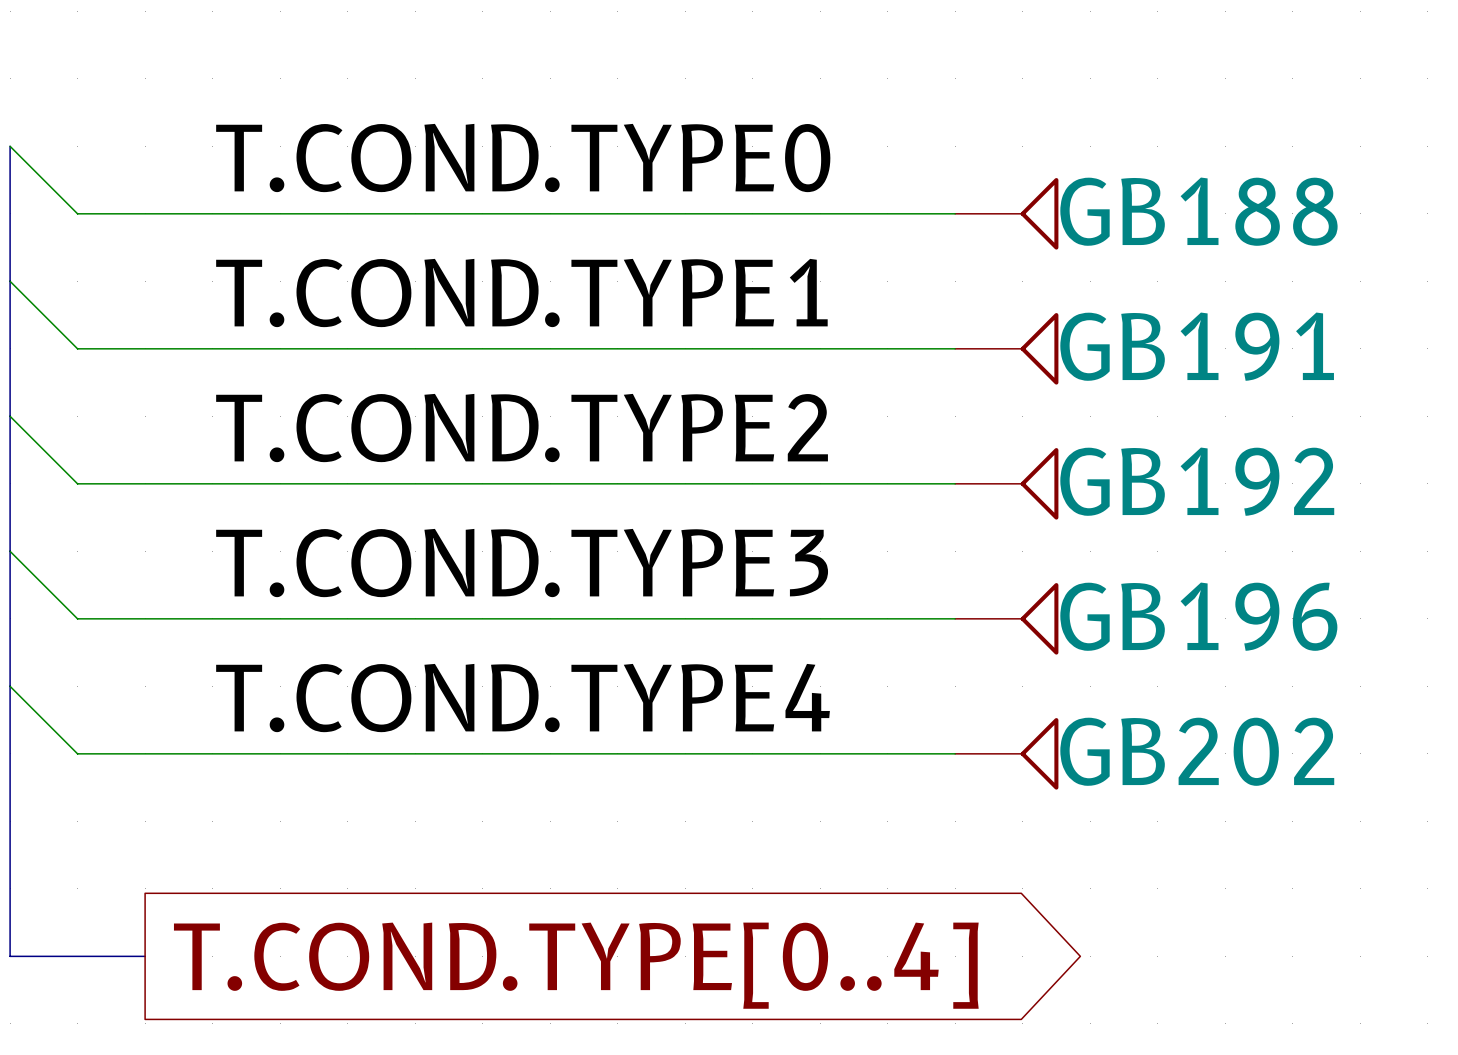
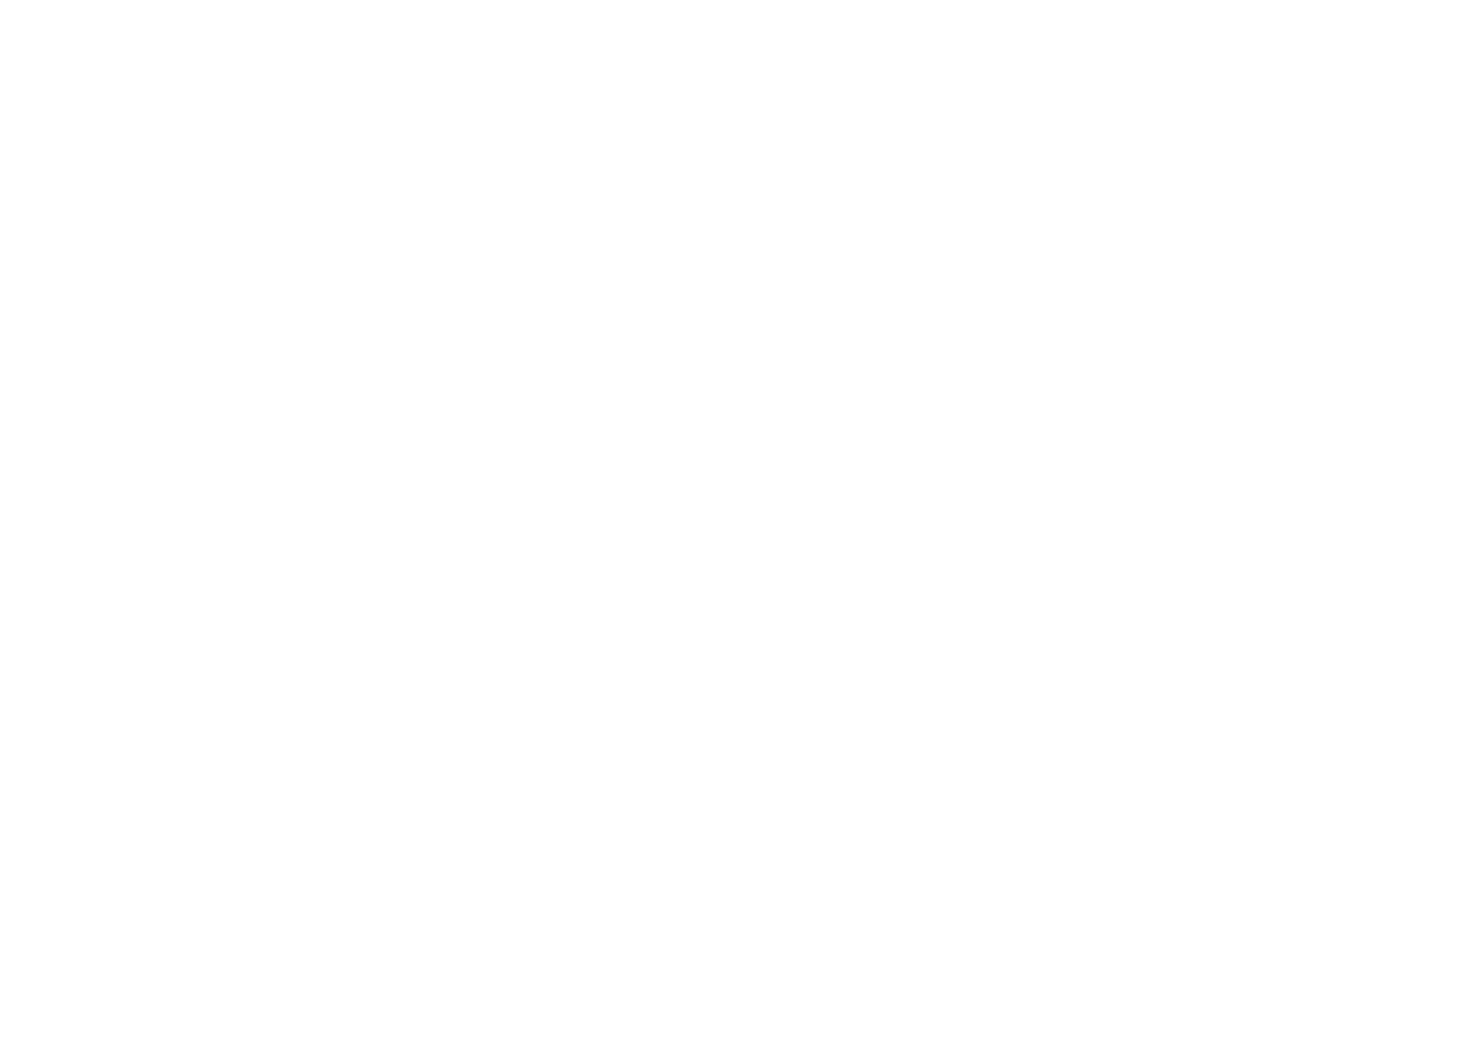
wire: (10, 146) (77, 213) (955, 213) -> none
bus: (10, 146) (10, 956) (145, 956) -> none
label: T.COND.TYPE0 (523, 158) -> none
GB188: (1006, 213) -> none
wire: (10, 281) (77, 348) (955, 348) -> none
label: T.COND.TYPE1 (521, 293) -> none
GB191: (1006, 348) -> none
wire: (10, 416) (77, 483) (955, 483) -> none
label: T.COND.TYPE2 (522, 428) -> none
GB192: (1006, 483) -> none
wire: (10, 551) (77, 618) (955, 618) -> none
label: T.COND.TYPE3 (522, 563) -> none
GB196: (1006, 618) -> none
wire: (10, 686) (77, 753) (955, 753) -> none
label: T.COND.TYPE4 (523, 698) -> none
GB202: (1006, 753) -> none
global label: T.COND.TYPE[0..4] (576, 965) -> none

